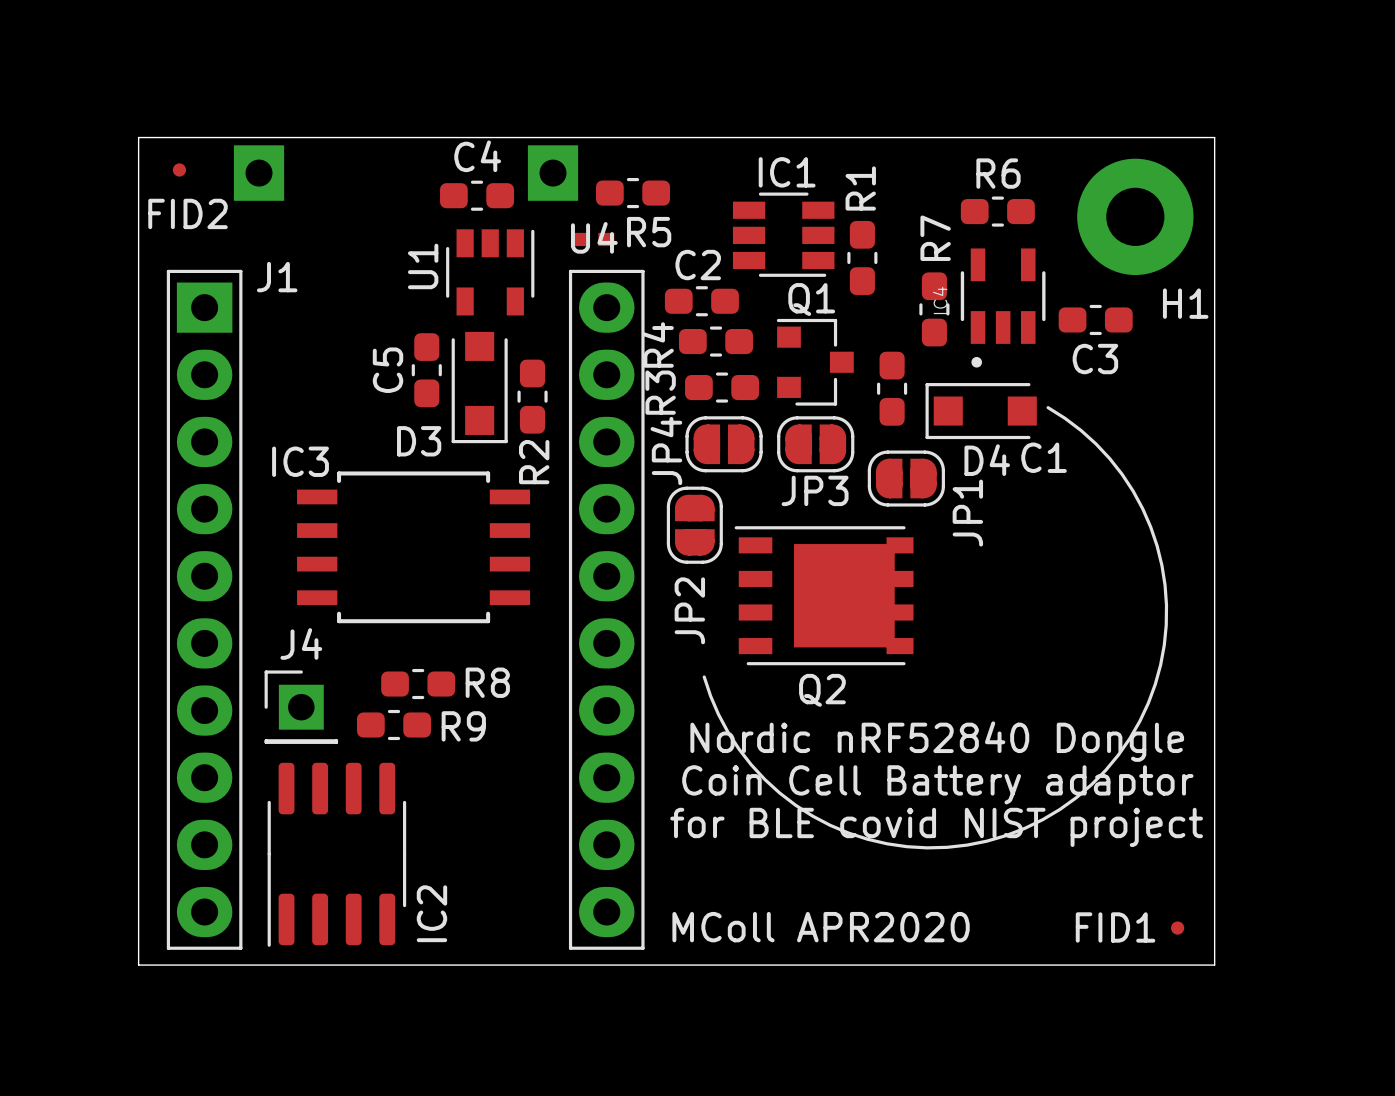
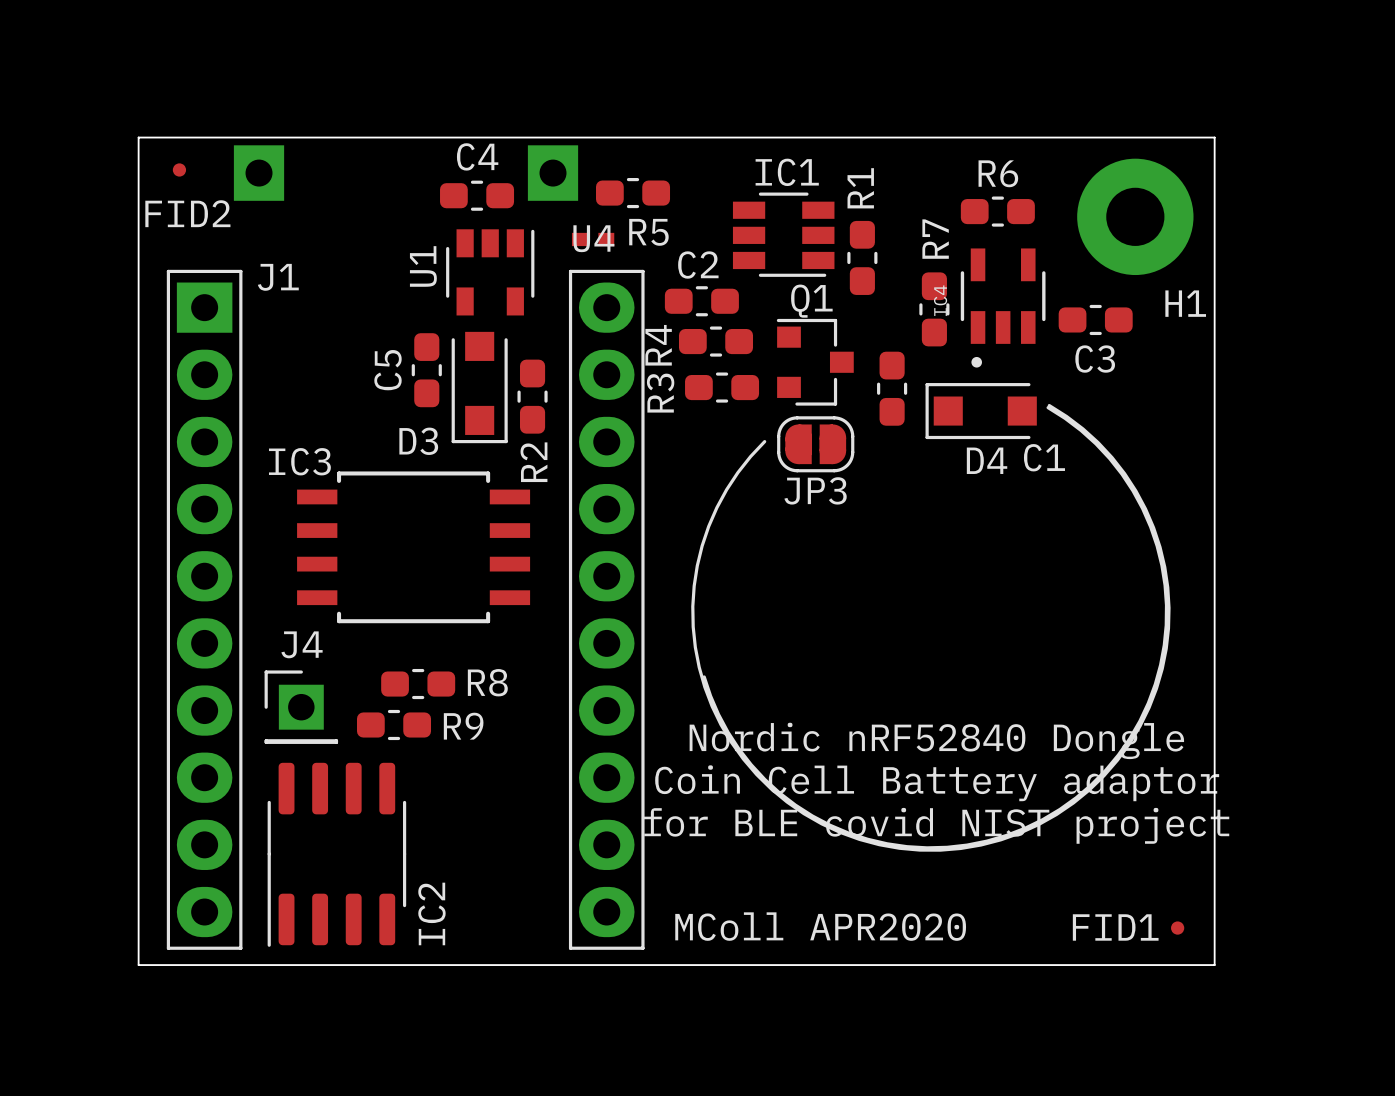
line: none -> (1049, 405) (1066, 416) (1098, 442) (1124, 473) (1145, 508) (1160, 547) (1167, 587) (1168, 628) (1166, 648) (1156, 688) (1140, 726) (1117, 760) (1089, 789) (1056, 814) (1020, 832) (1000, 839) (960, 848) (919, 850) (879, 844) (859, 839) (821, 823) (787, 802) (756, 774) (731, 742) (712, 706) (699, 667) (695, 647) (692, 606) (697, 565) (708, 526) (716, 507) (737, 472) (764, 441)
JP4: (724, 444) -> none
JP1: (906, 478) -> none
JP2: (694, 525) -> none
Q2: (824, 595) -> none

